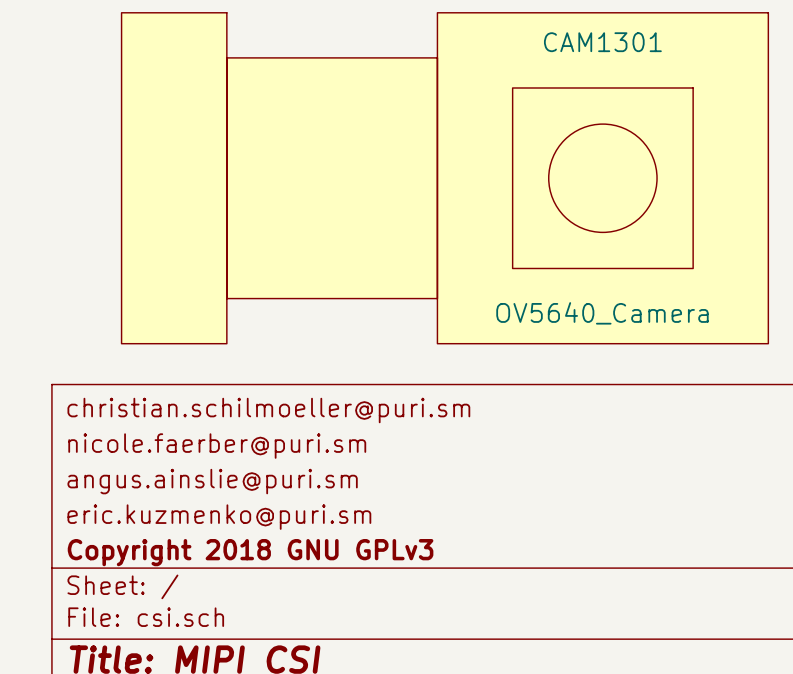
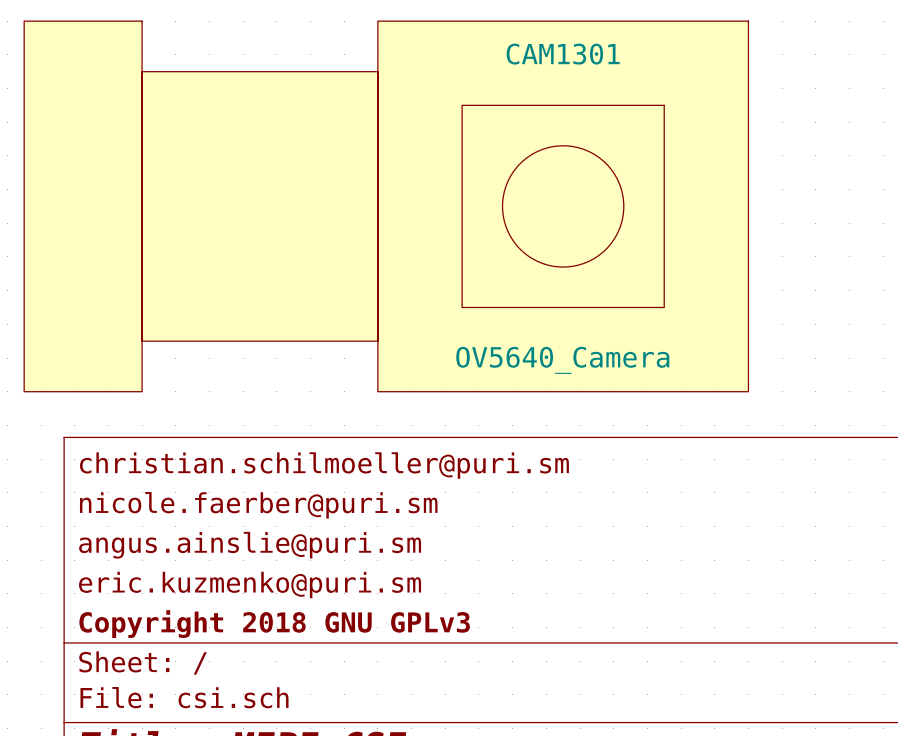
CAM1301 position: (444, 178) -> (386, 206)

